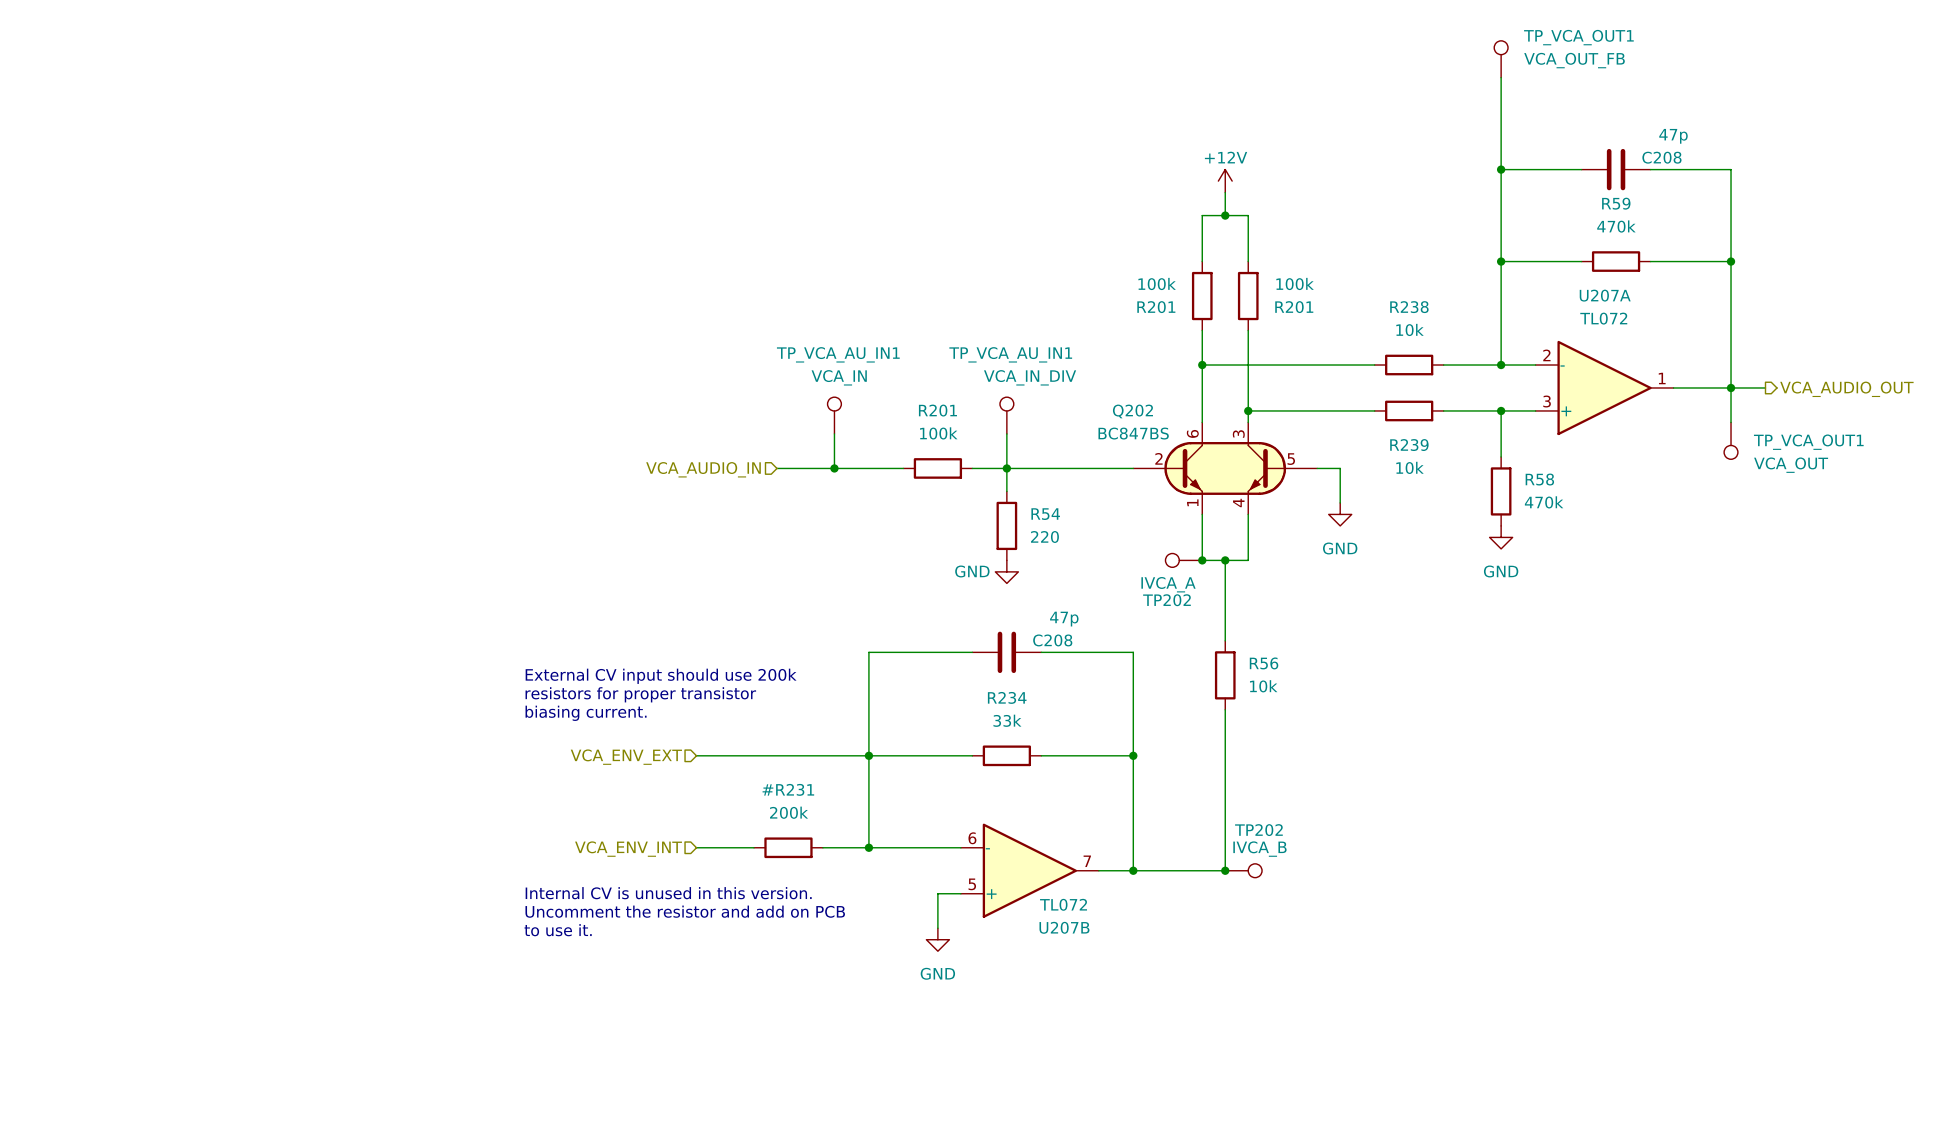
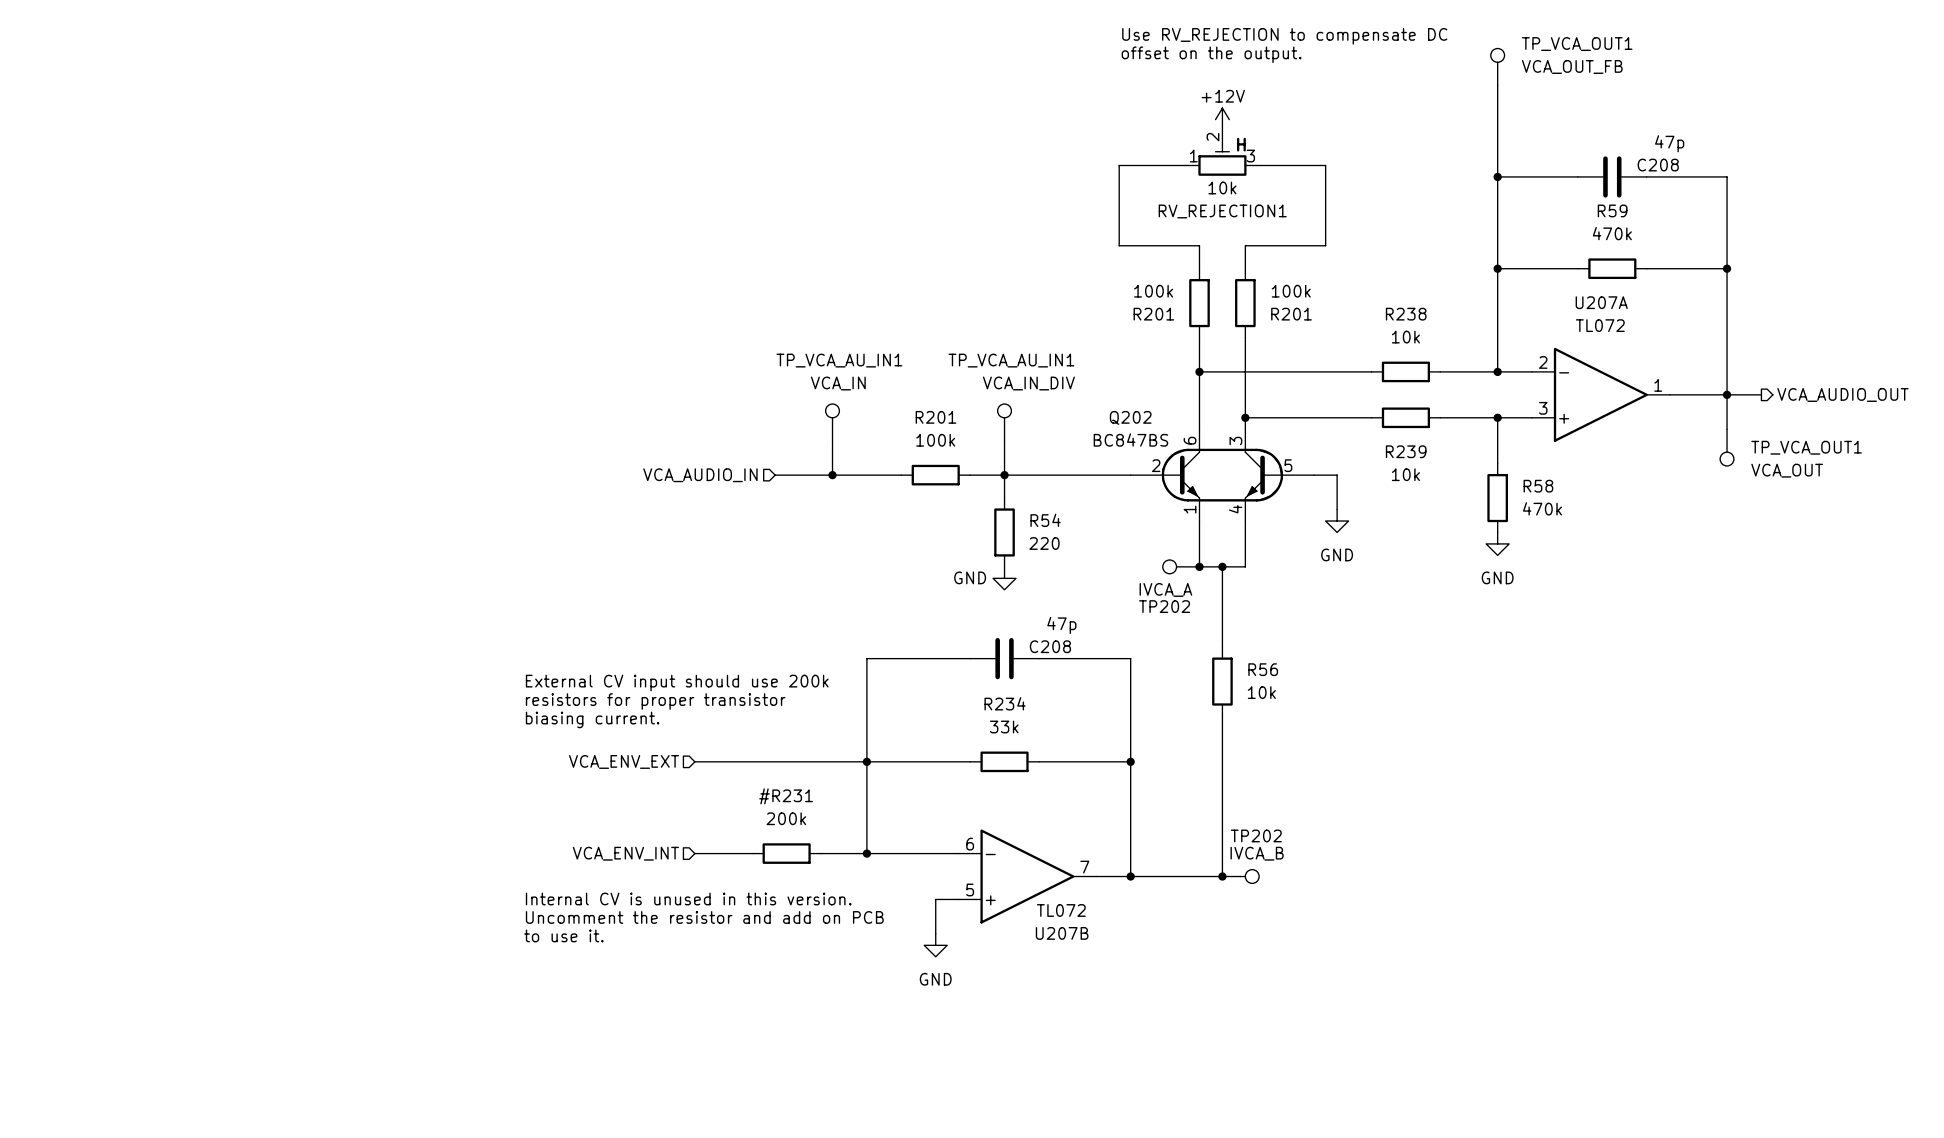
text: none -> Use RV_REJECTION to compensate DC (1284, 36)
text: none -> offset on the output. (1211, 54)
text: none -> H (1241, 144)
RV_REJECTION1: none -> 10k (1222, 153)
wire: none -> (1256, 165) (1325, 165) (1325, 245) (1245, 245)
power symbol position: +12V (1225, 181) -> +12V (1222, 119)
wire: (1225, 192) (1225, 215) -> none
junction: (1225, 215) -> none
wire: (1202, 238) (1202, 215) (1248, 215) (1248, 238) -> (1199, 245) (1119, 245) (1119, 165) (1188, 165)

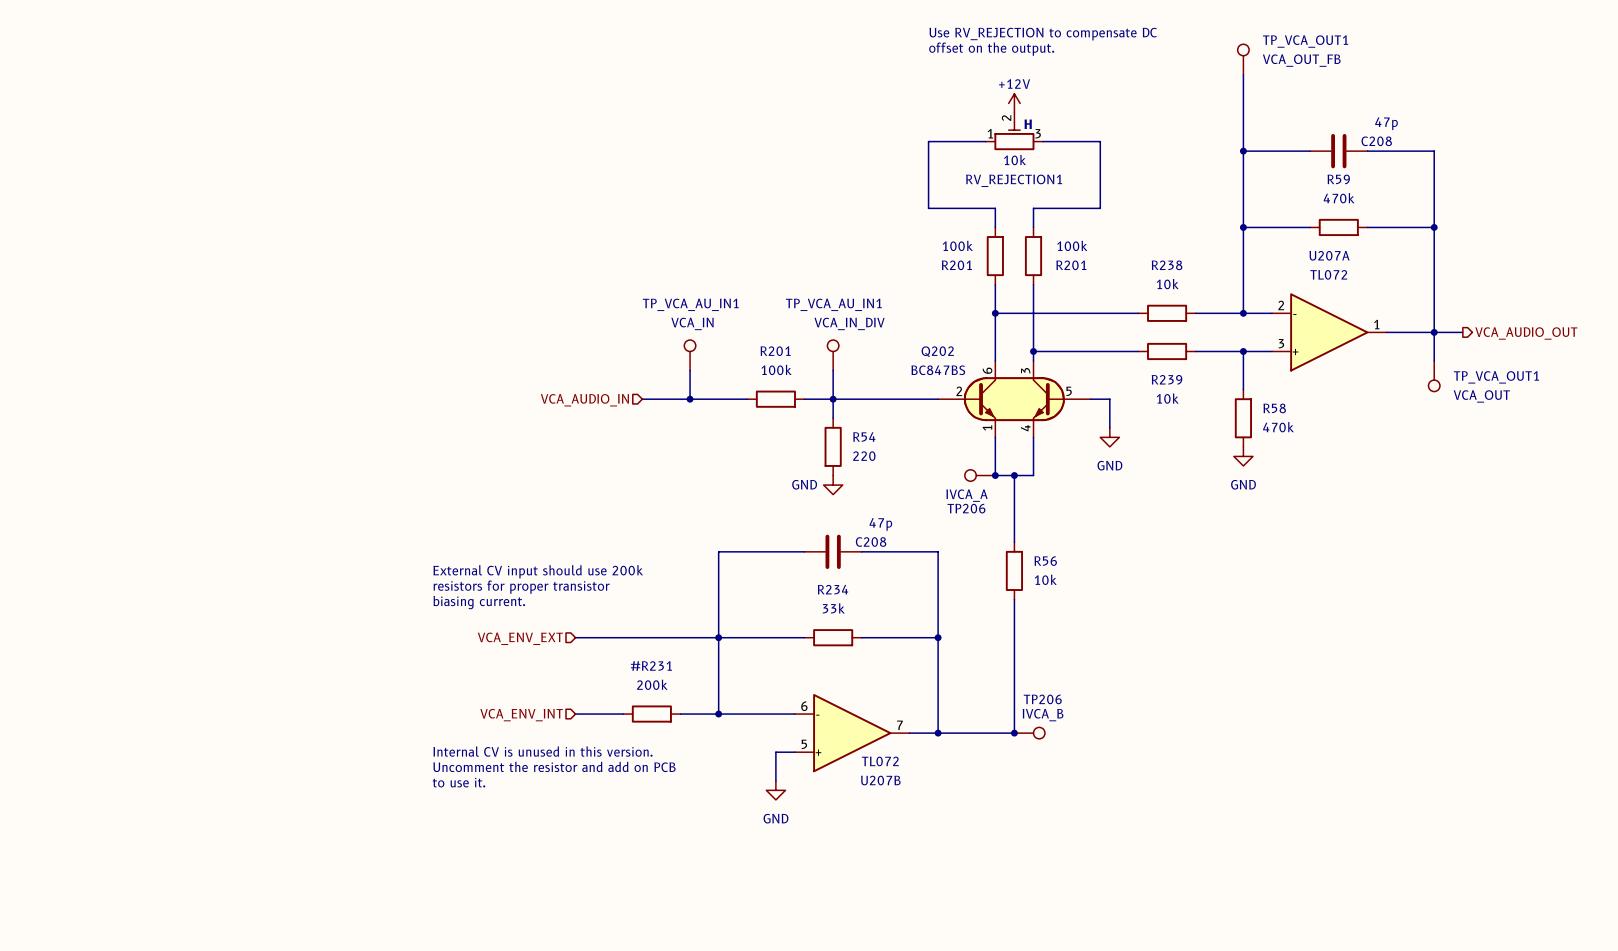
TP202 name: TP202 (1164, 606) -> TP206 (966, 508)
TP202 name: TP202 (1256, 835) -> TP206 (1042, 699)

